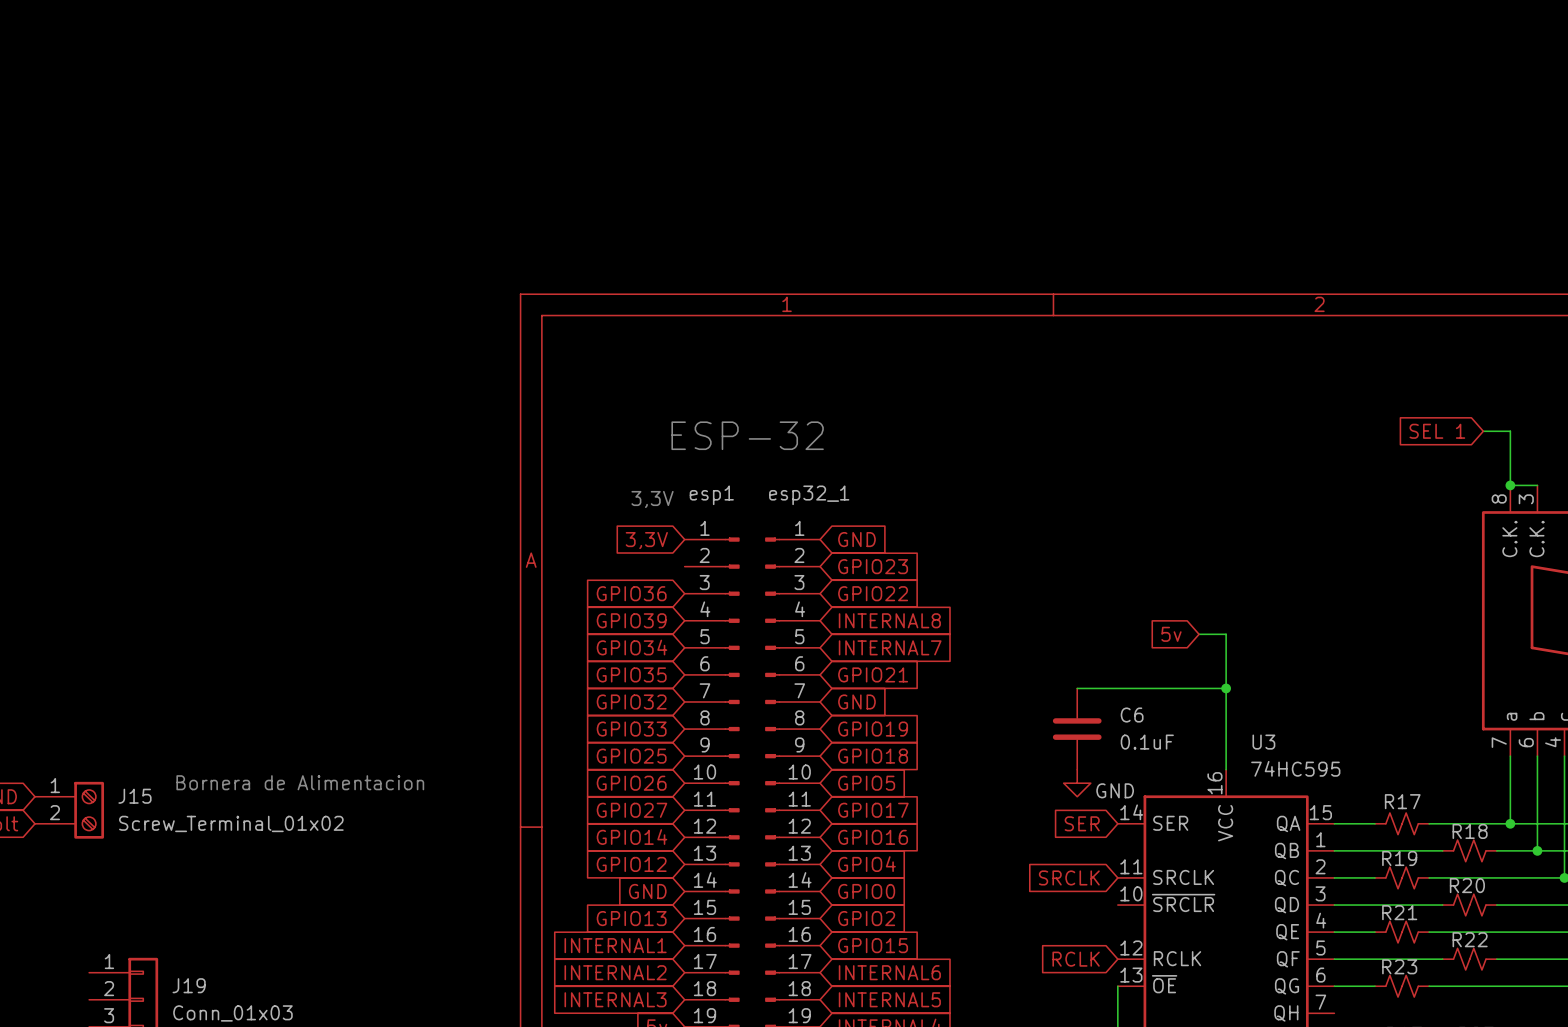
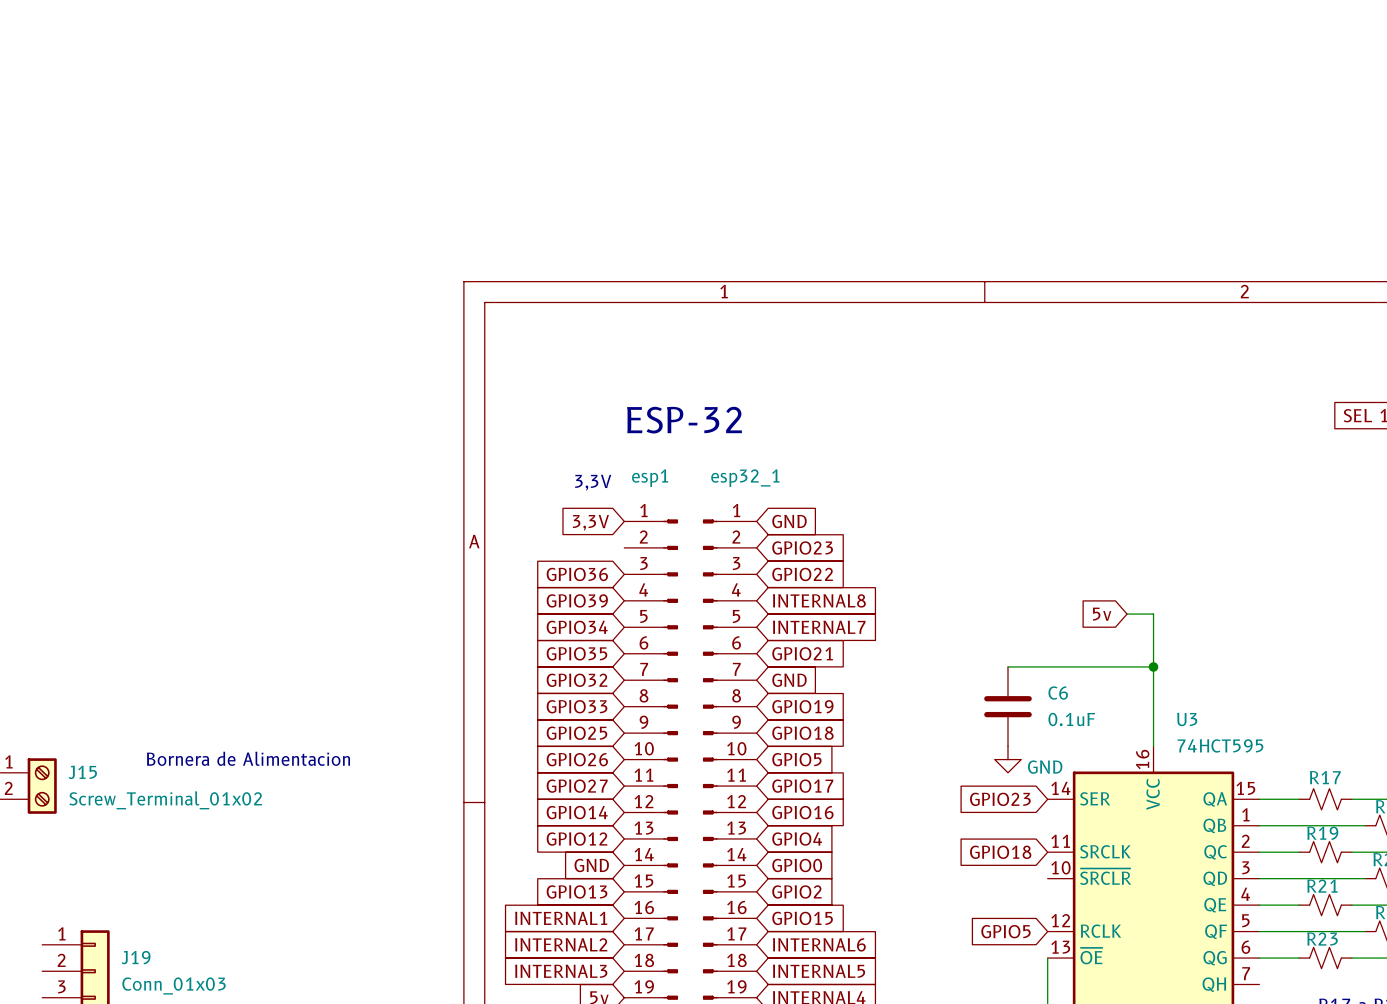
U3 value: 74HC595 (1295, 768) -> 74HCT595 (1220, 745)
global label: SER (1082, 823) -> GPIO23 (1000, 799)
global label: SRCLK (1069, 877) -> GPIO18 (1000, 852)
global label: RCLK (1076, 959) -> GPIO5 (1005, 931)

